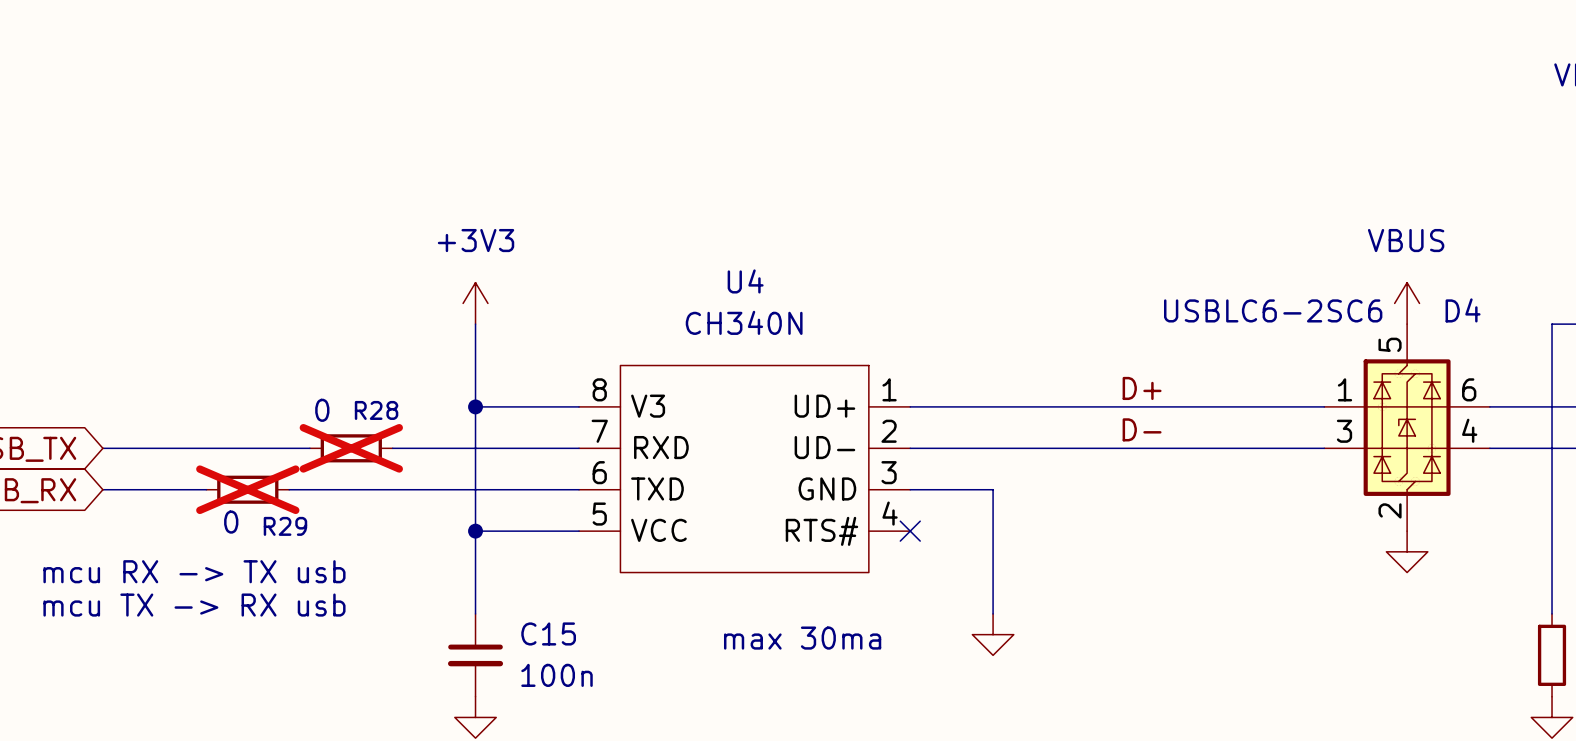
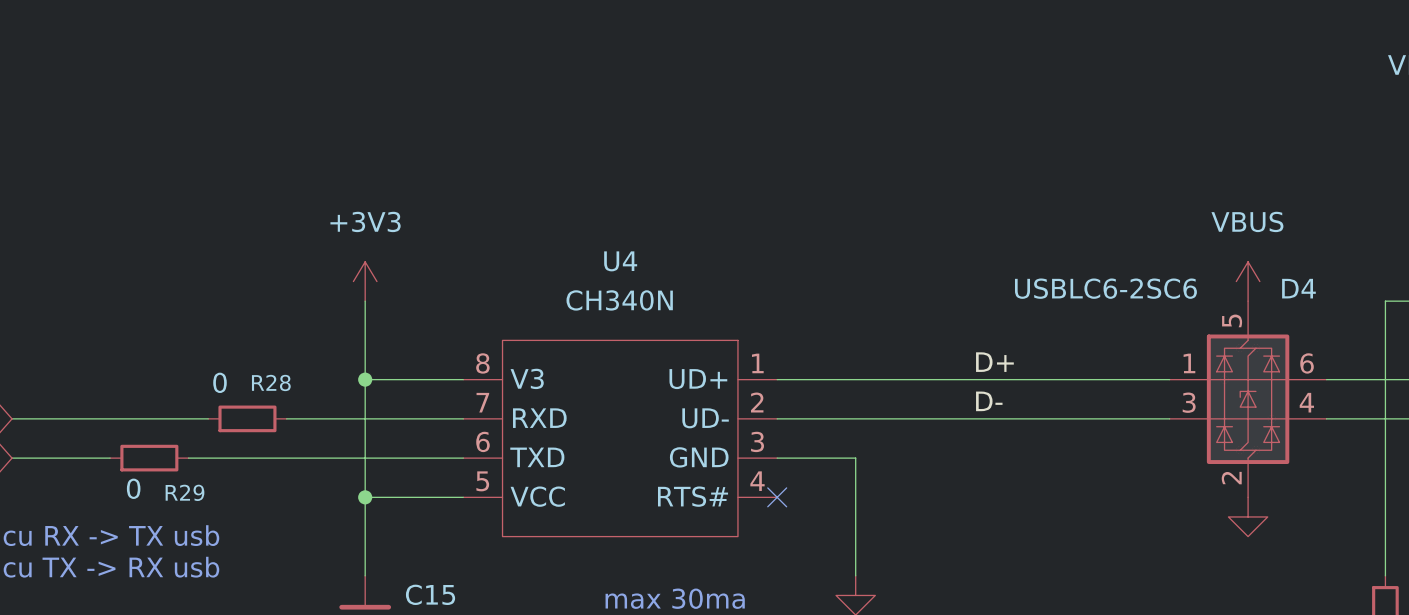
R28 do-not-place cross: (351, 448) -> none
R29 do-not-place cross: (247, 489) -> none

